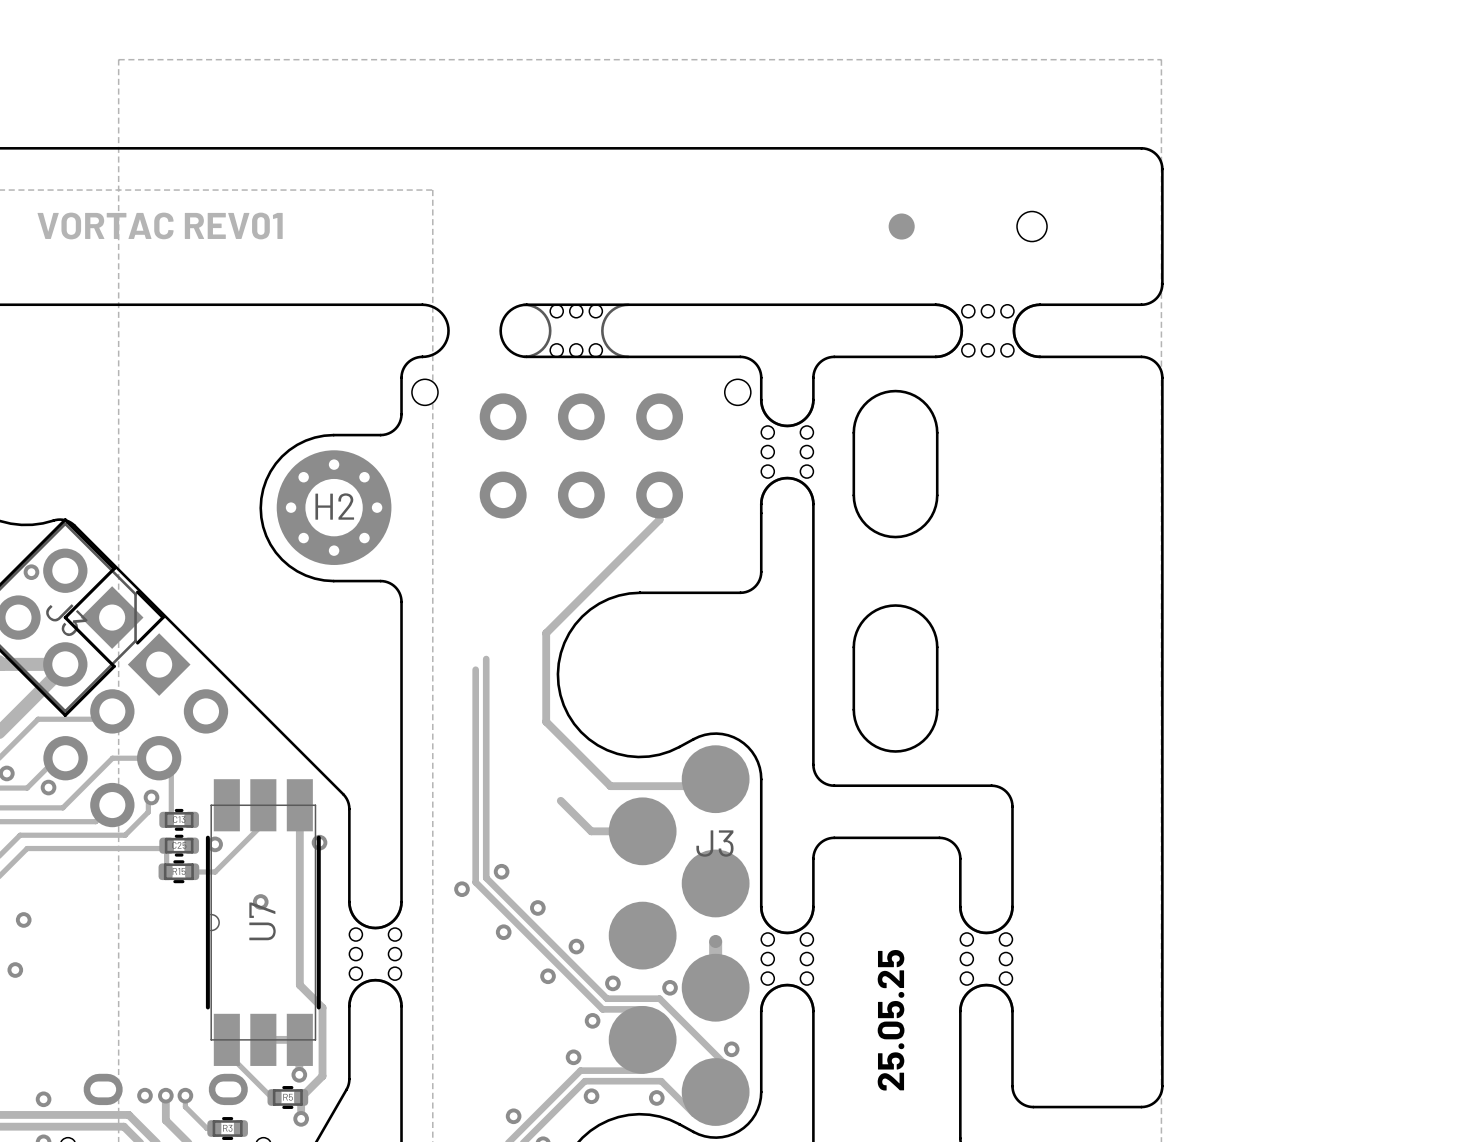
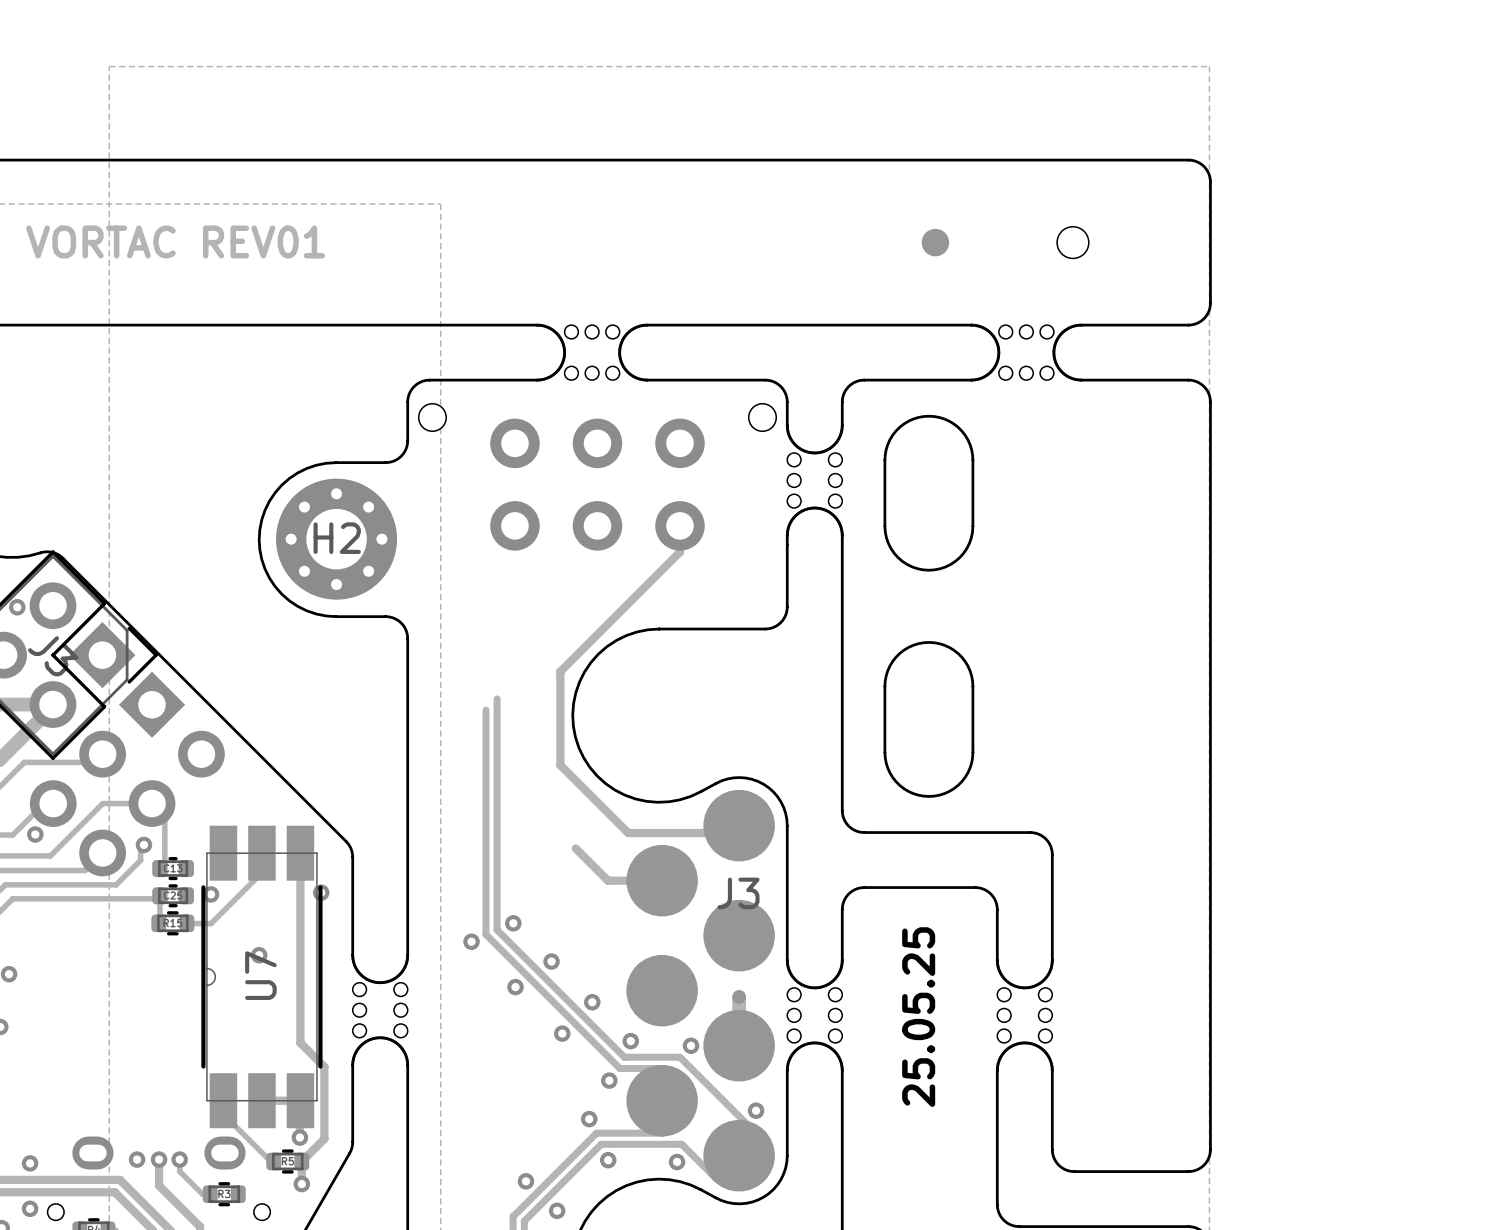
board edge: (422, 304) (431, 306) (439, 311) (445, 318) (448, 330) (445, 342) (439, 350) (431, 355) (422, 356) -> (429, 325) (544, 326) (558, 335) (564, 352) (558, 369) (544, 379) (429, 380)
board edge: (628, 304) (519, 305) (506, 314) (500, 330) (506, 346) (519, 355) (628, 356) -> (647, 325) (637, 326) (628, 332) (621, 342) (619, 352) (621, 362) (626, 370) (634, 376) (647, 380)
text position: 25.05.25 (891, 1020) -> 25.05.25 (918, 1017)

